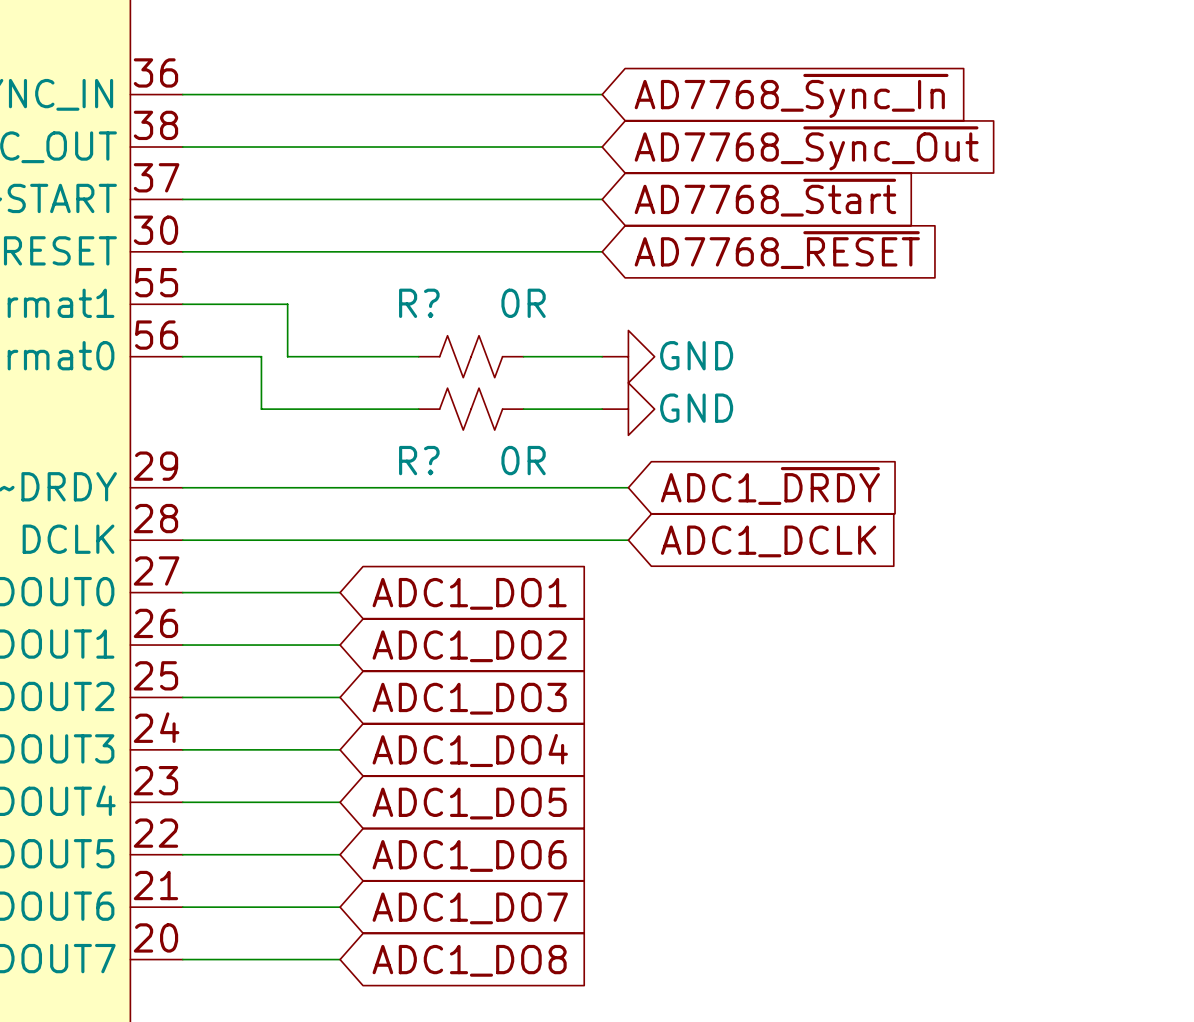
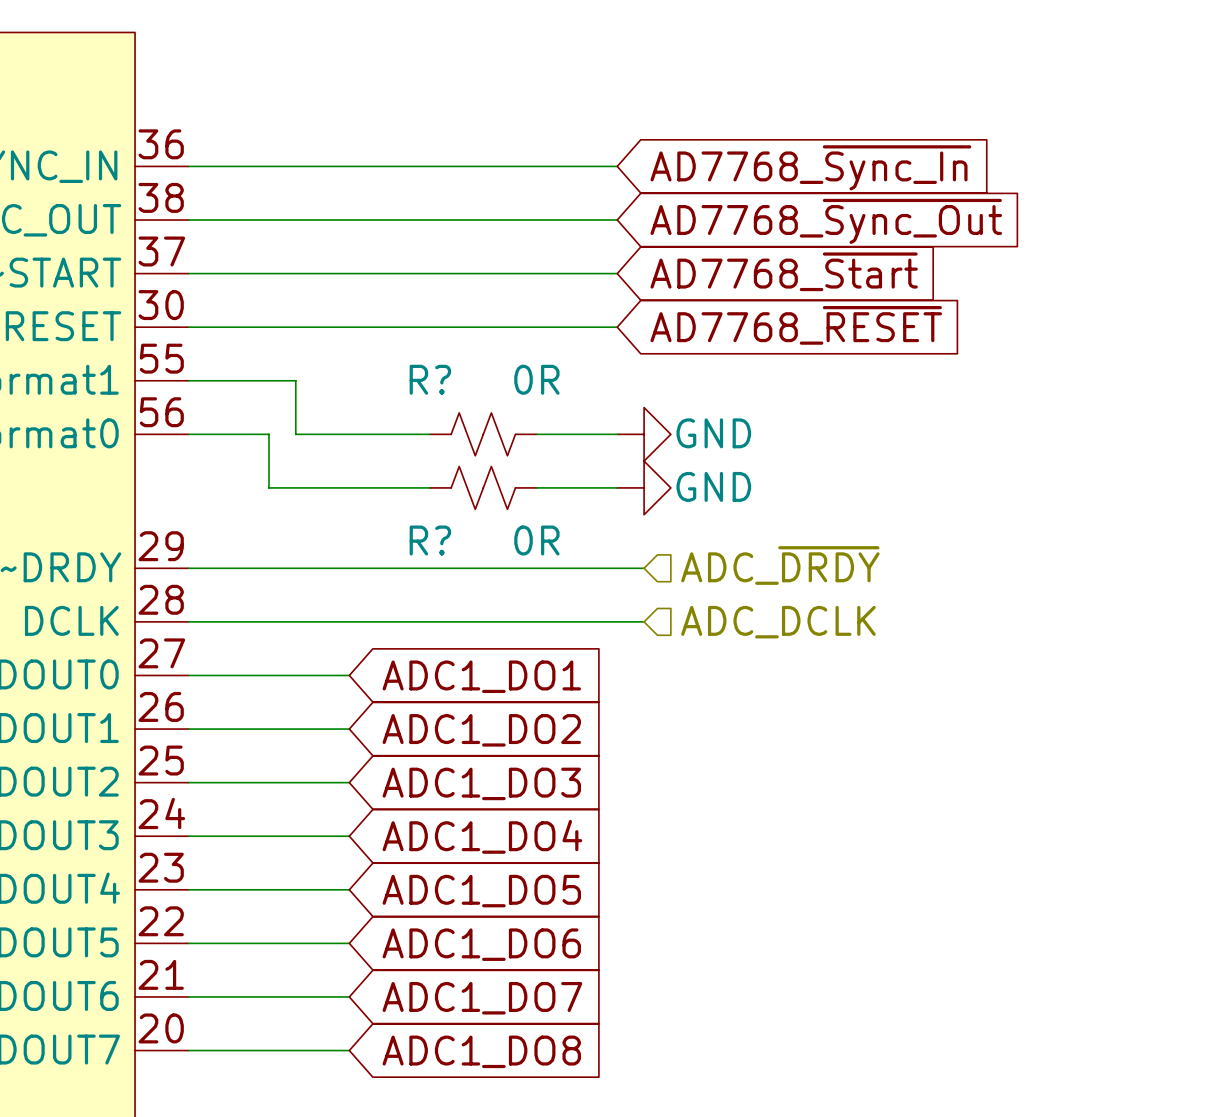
hierarchical label: none -> ADC_~{DRDY} (780, 565)
global label: ADC1_~{DRDY} (770, 485) -> none
hierarchical label: none -> ADC_DCLK (778, 622)
global label: ADC1_DCLK (768, 541) -> none

